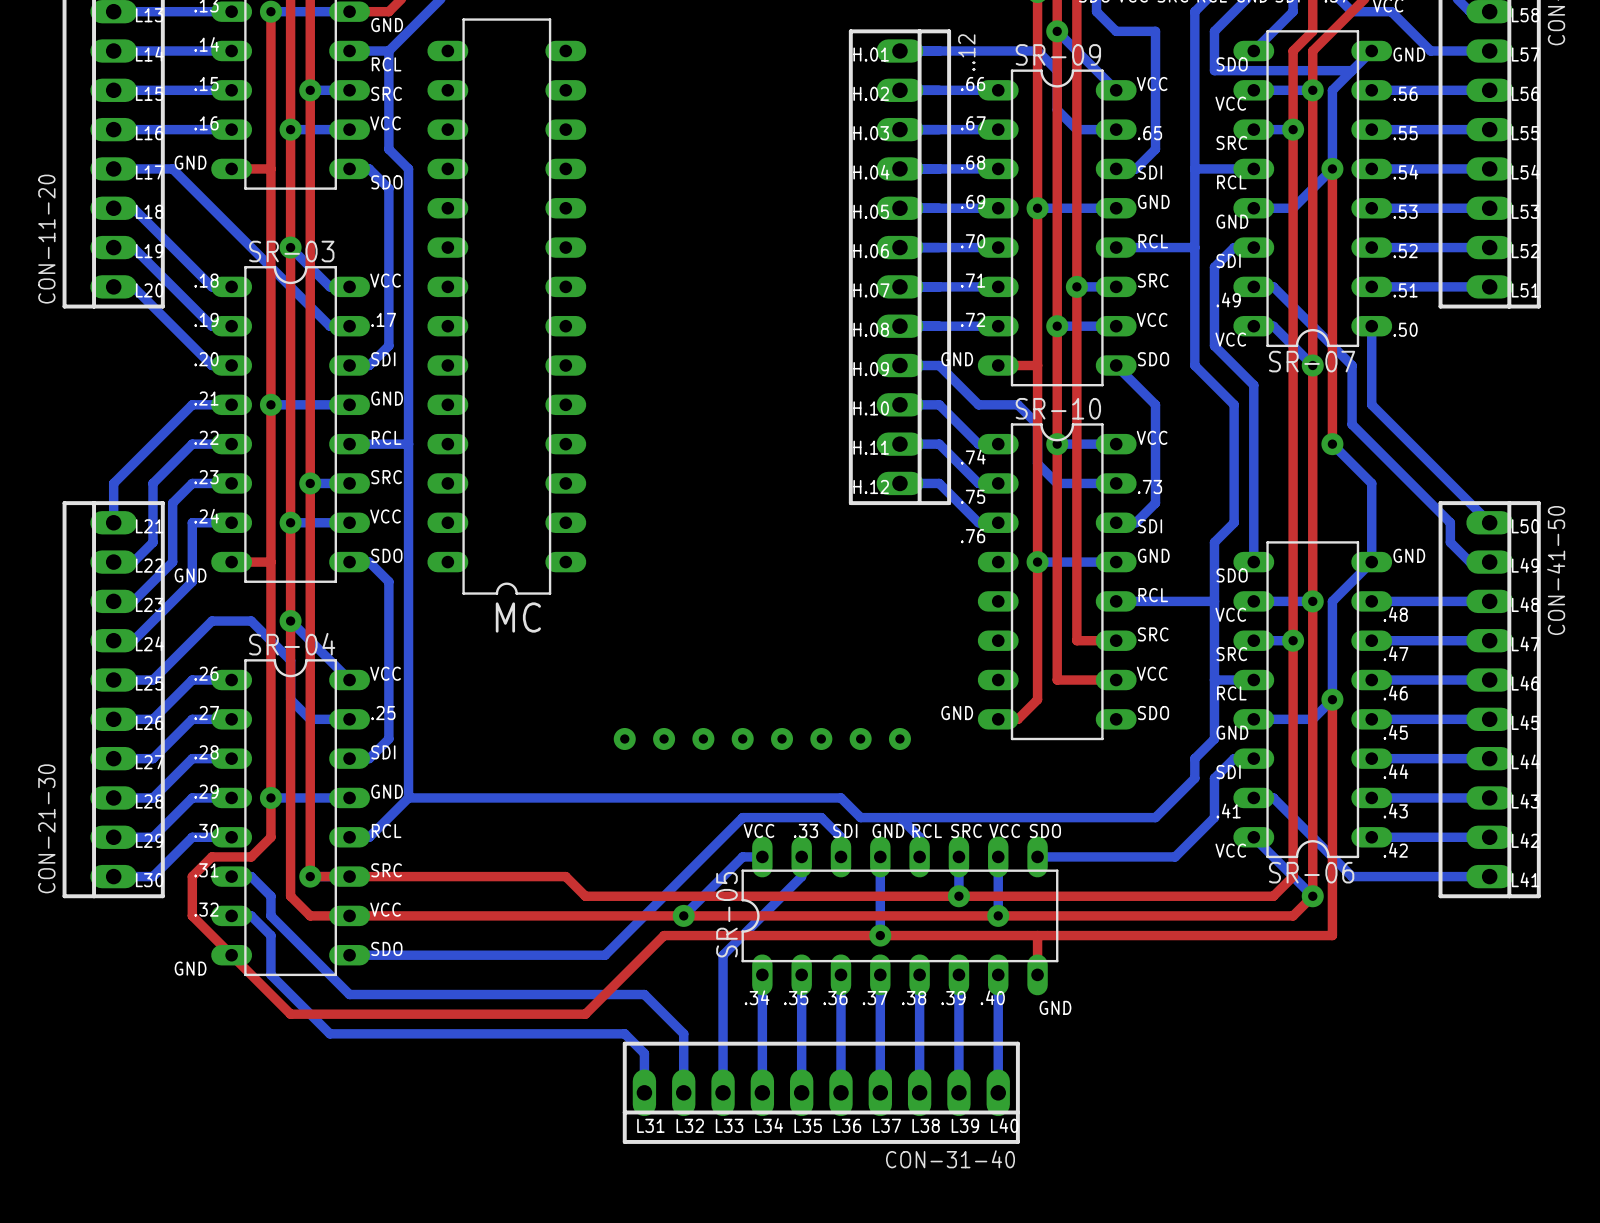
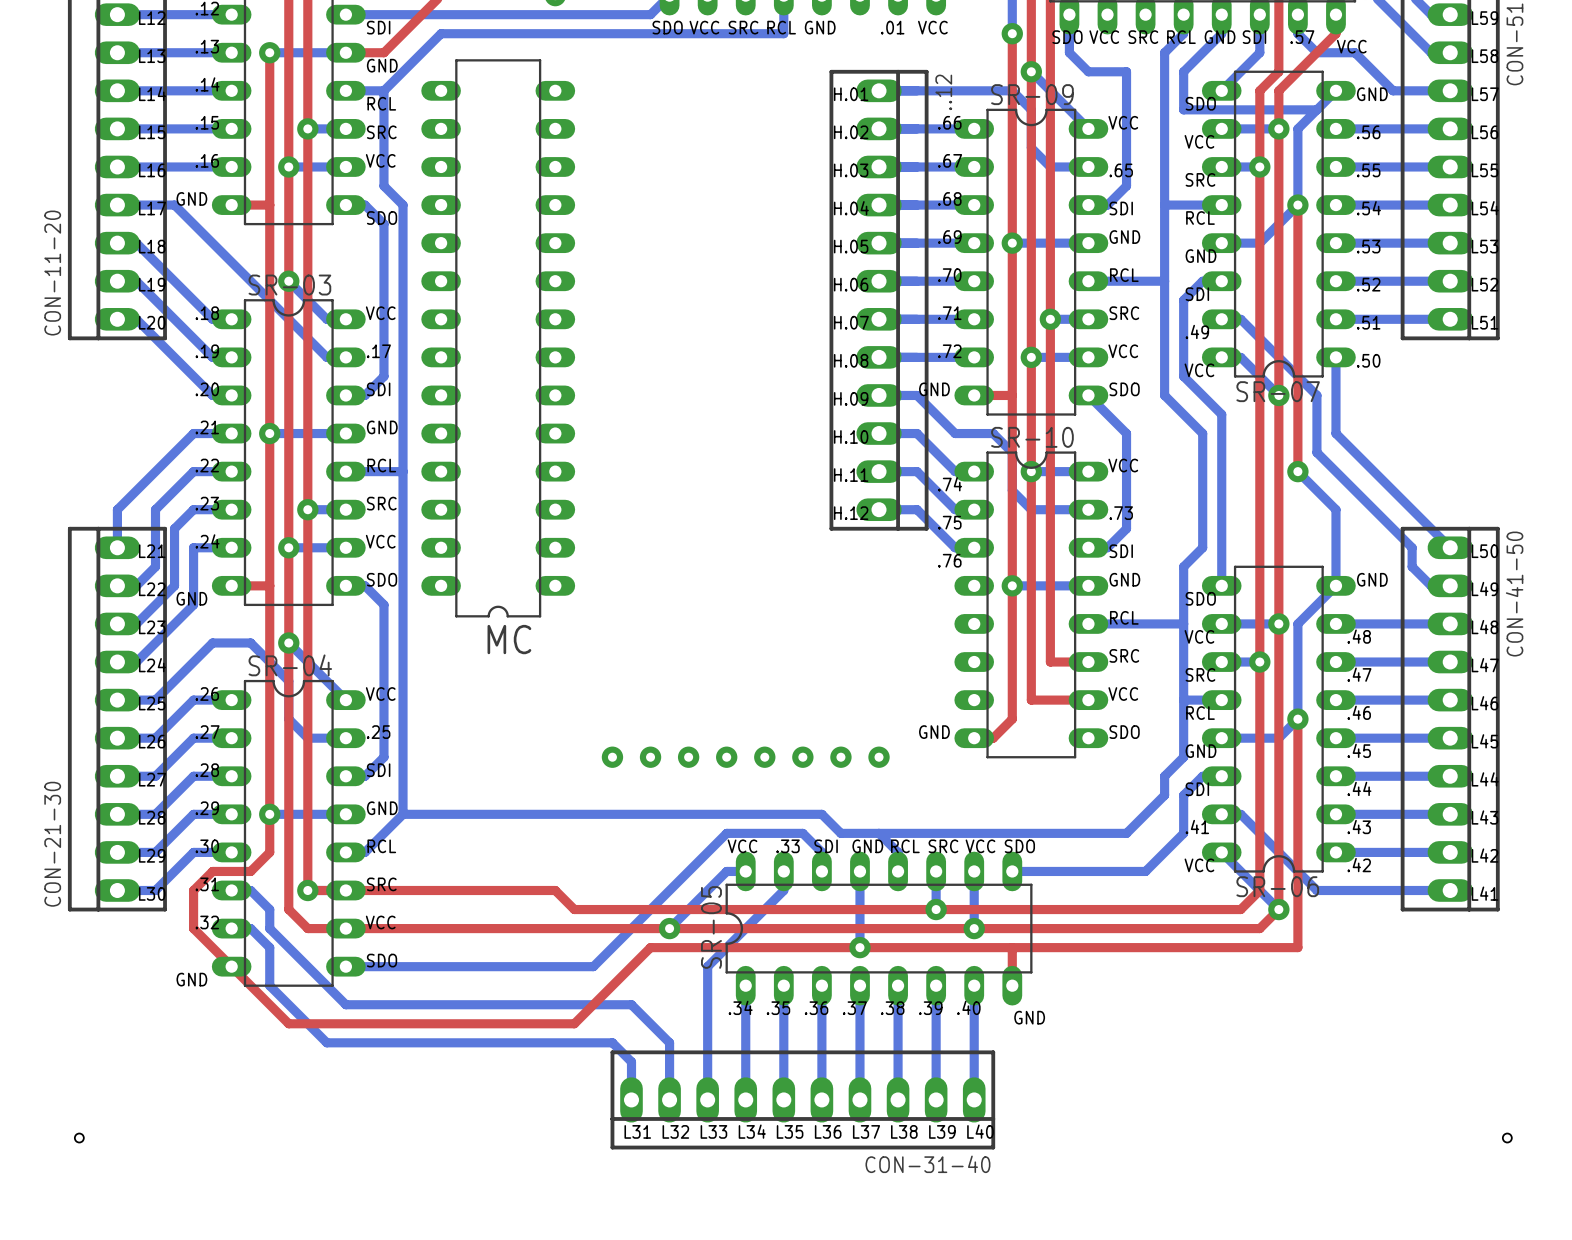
hole: none -> (79, 1138)
hole: none -> (1507, 1138)

